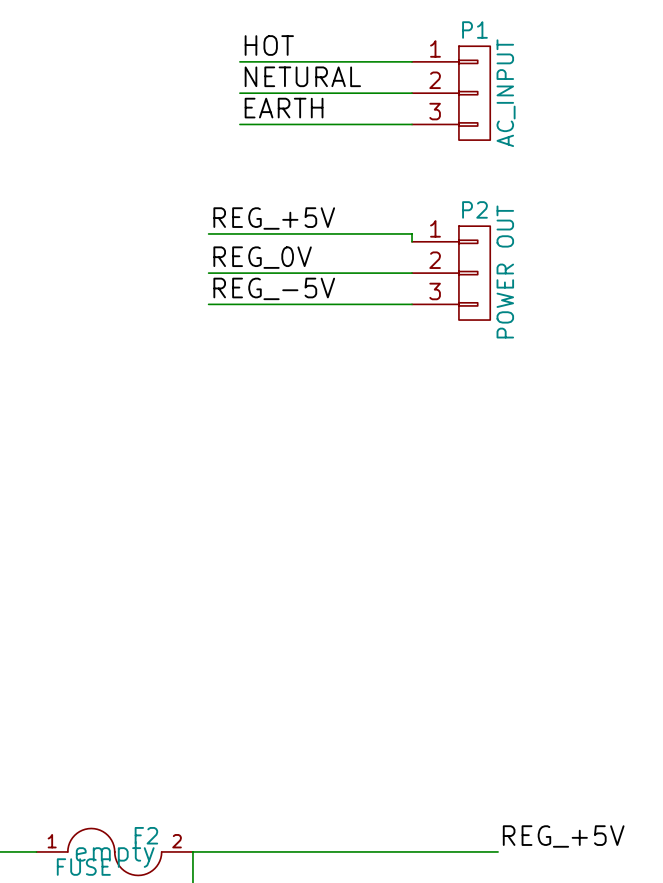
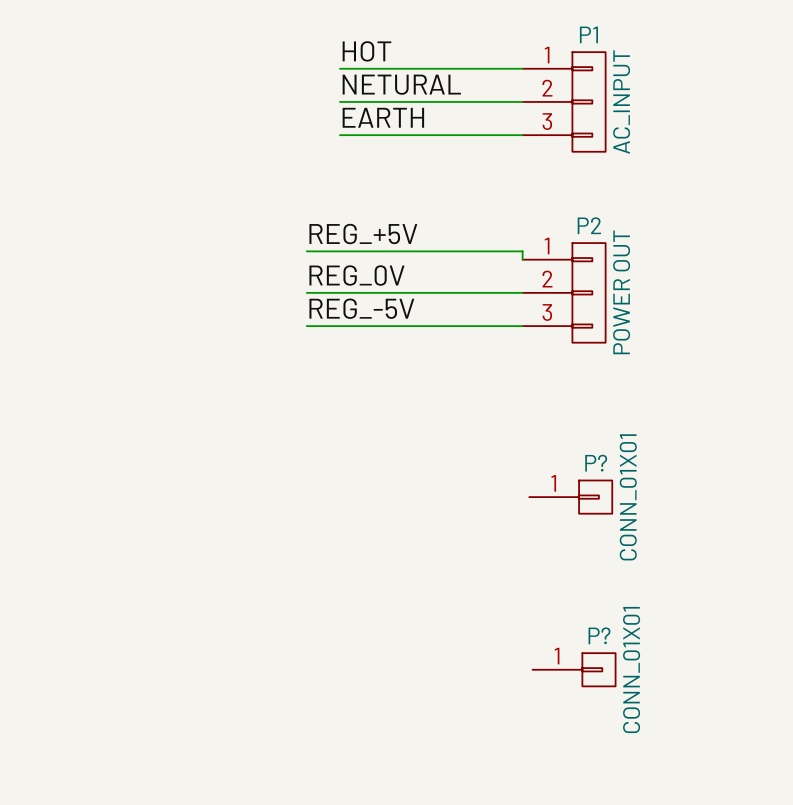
P?: none -> CONN_01X01 (570, 497)
P?: none -> CONN_01X01 (574, 669)

